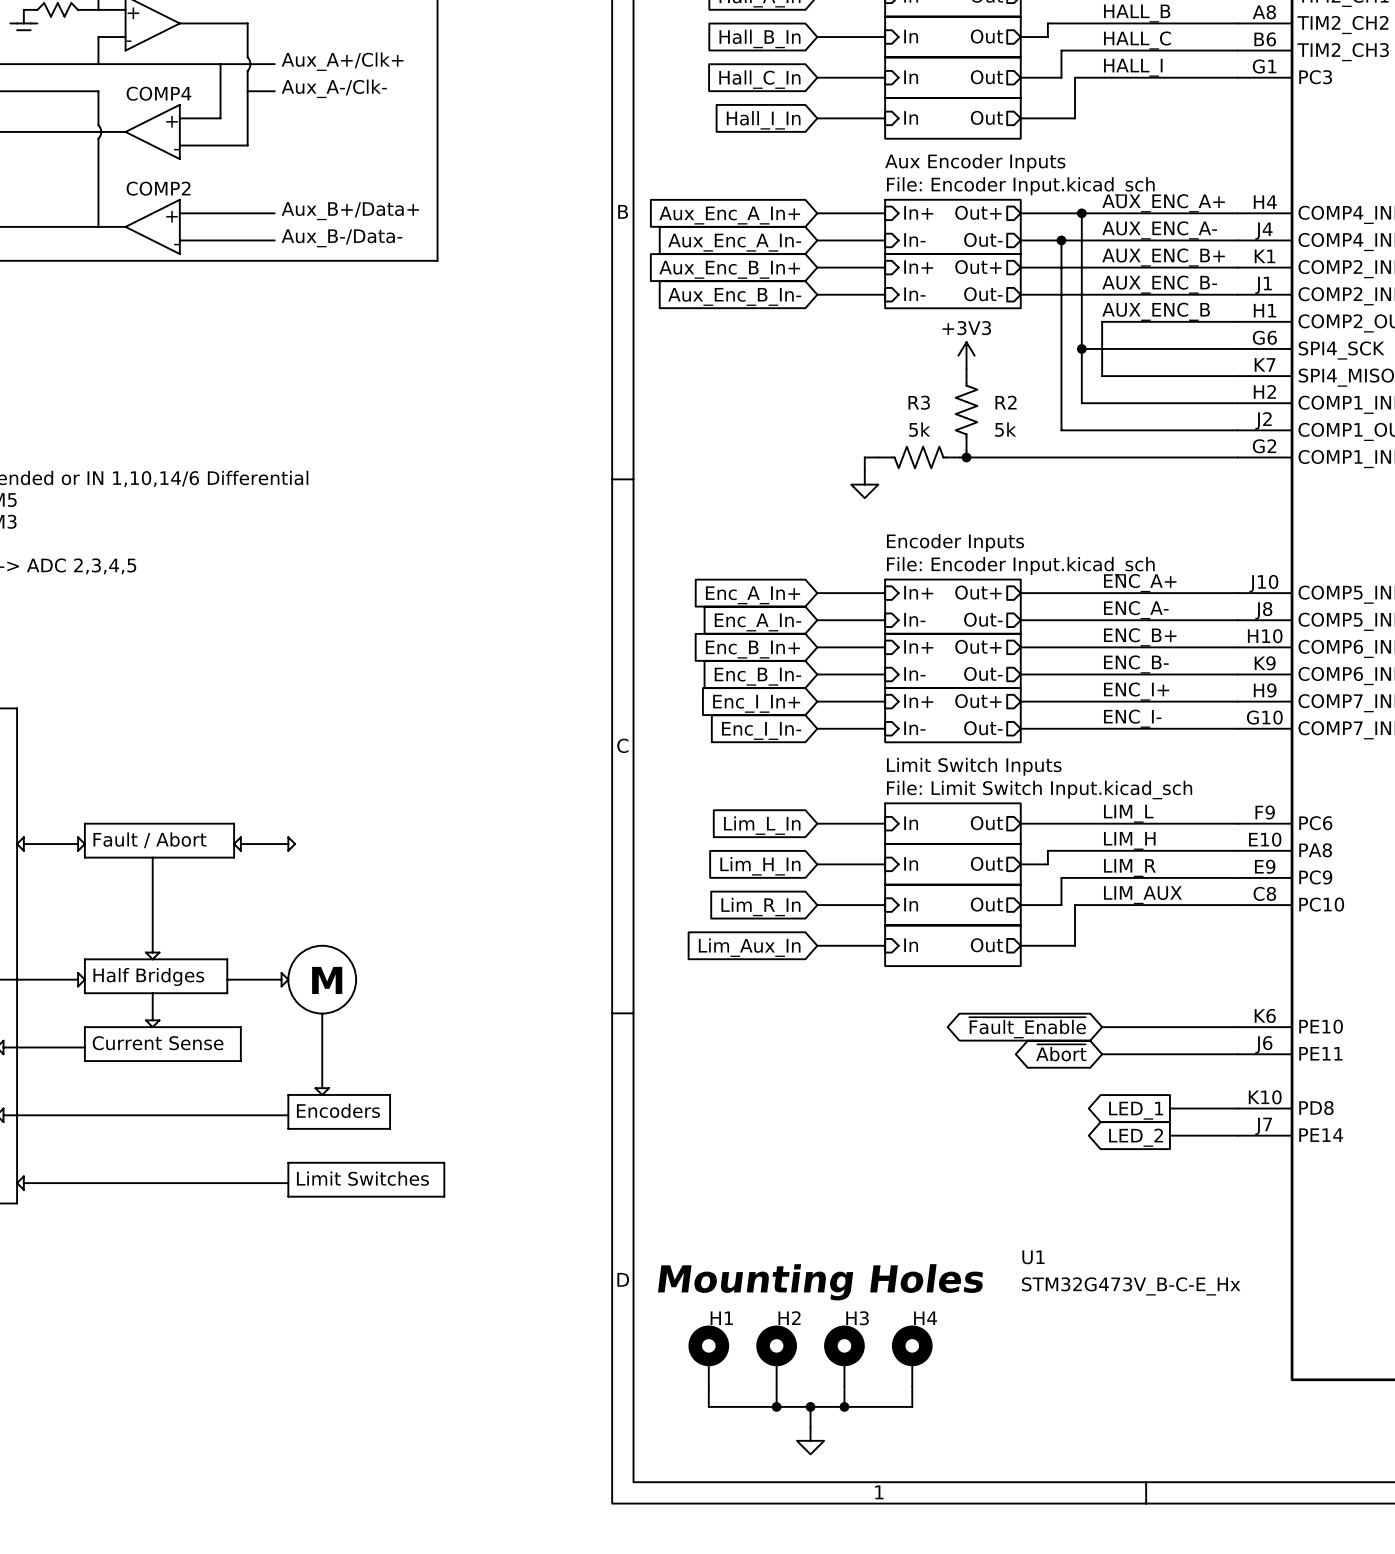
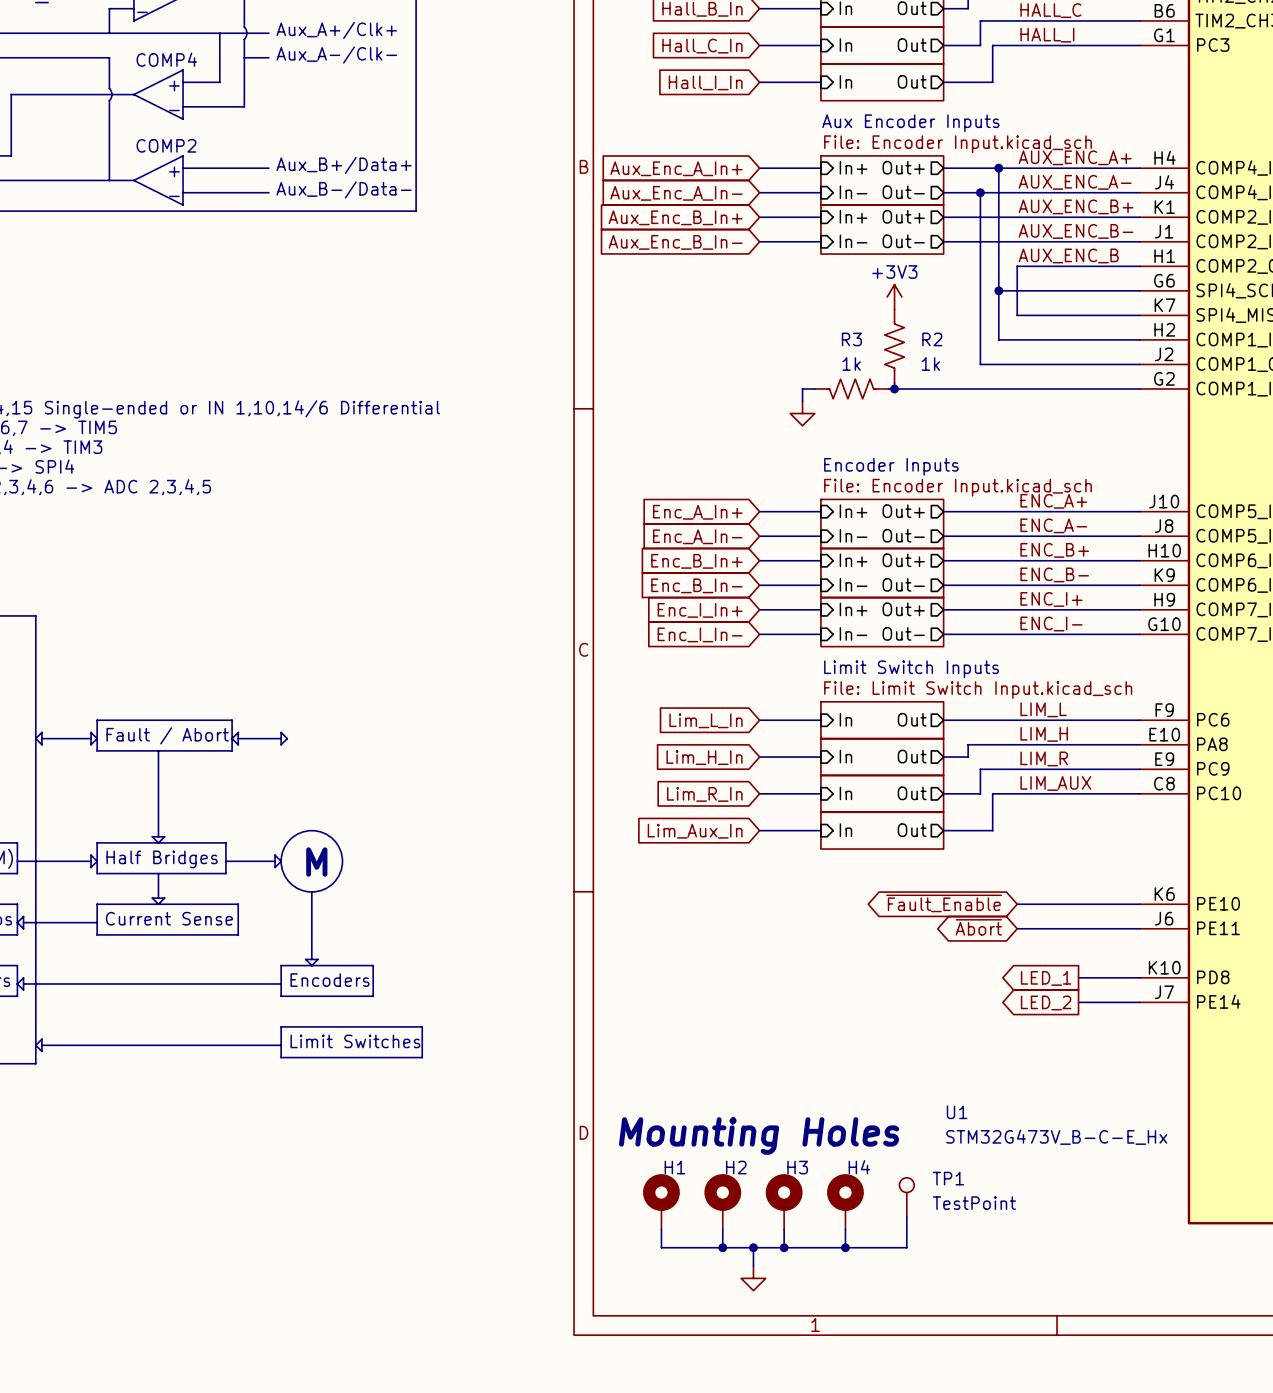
R3 value: 5k (919, 429) -> 1k (851, 364)
R2 value: 5k (1005, 429) -> 1k (930, 364)
TP1: none -> TestPoint (906, 1197)
wire: none -> (906, 1217) (906, 1247) (845, 1247)
junction: none -> (845, 1247)

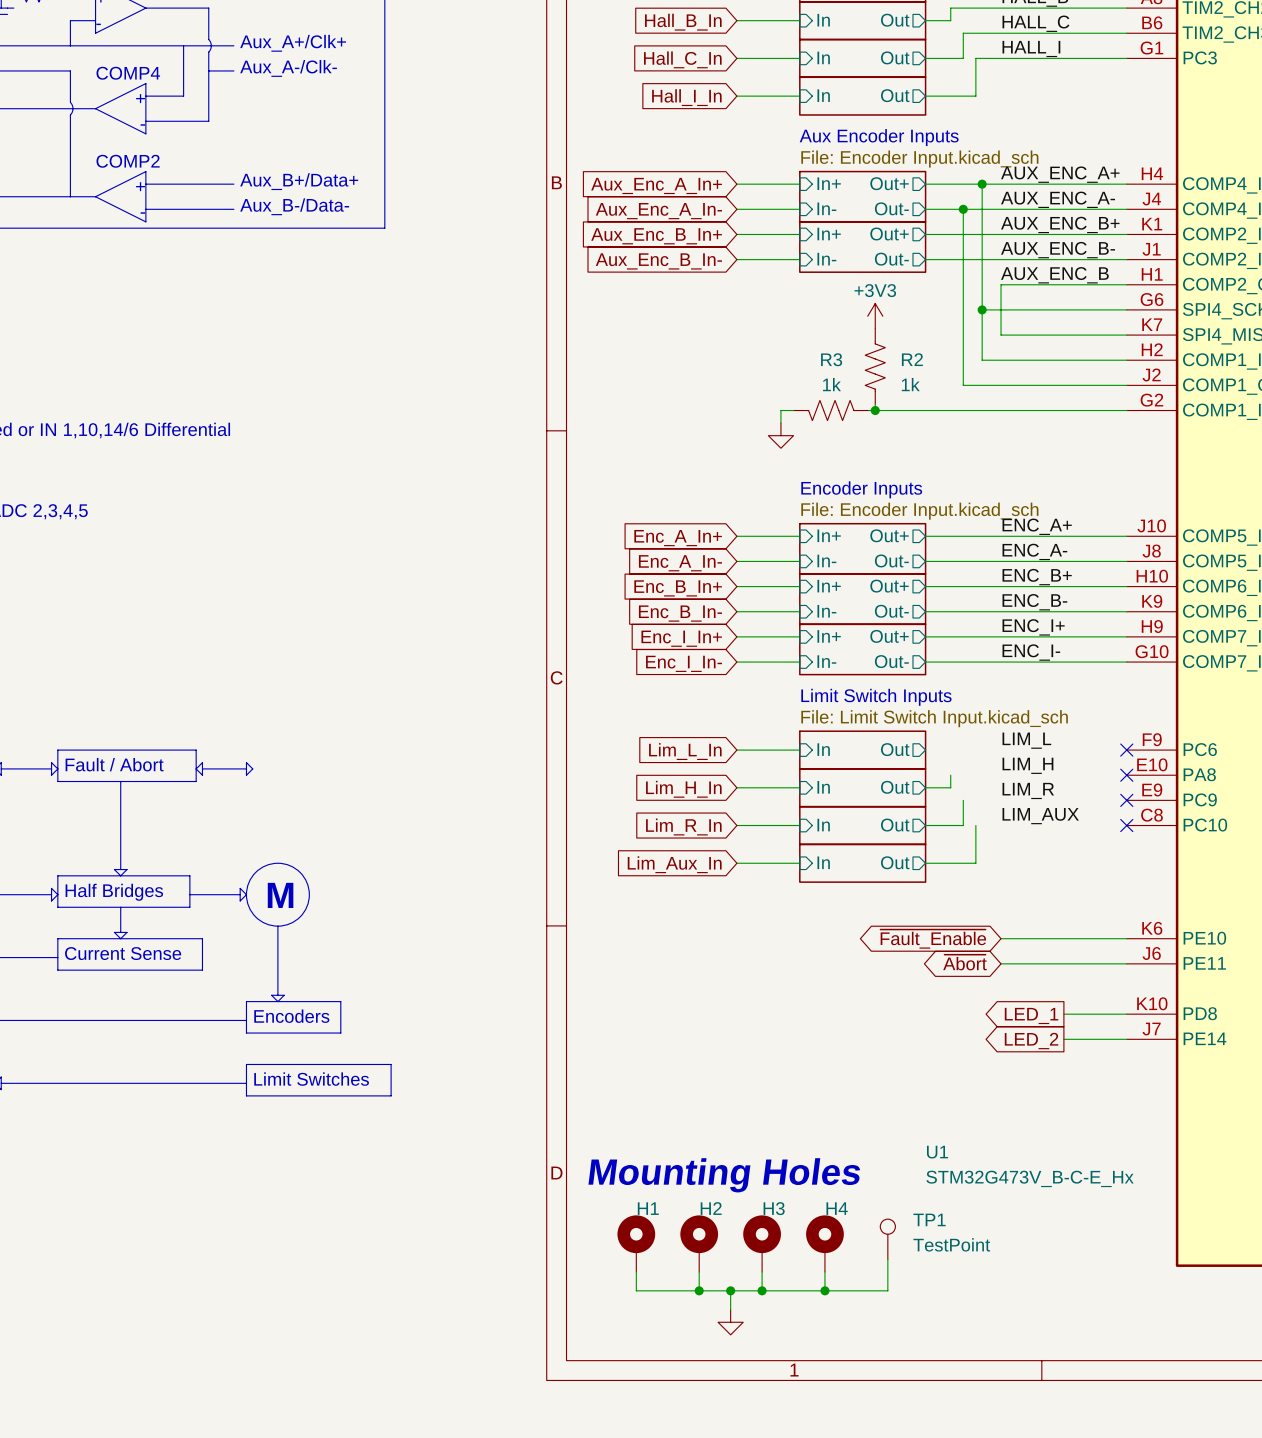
wire: (943, 720) (1139, 720) -> none
no-connect mark: none -> (1126, 750)
wire: (968, 744) (1139, 744) -> none
no-connect mark: none -> (1126, 775)
wire: (980, 769) (1139, 769) -> none
no-connect mark: none -> (1126, 800)
wire: (992, 793) (1139, 793) -> none
no-connect mark: none -> (1126, 825)

